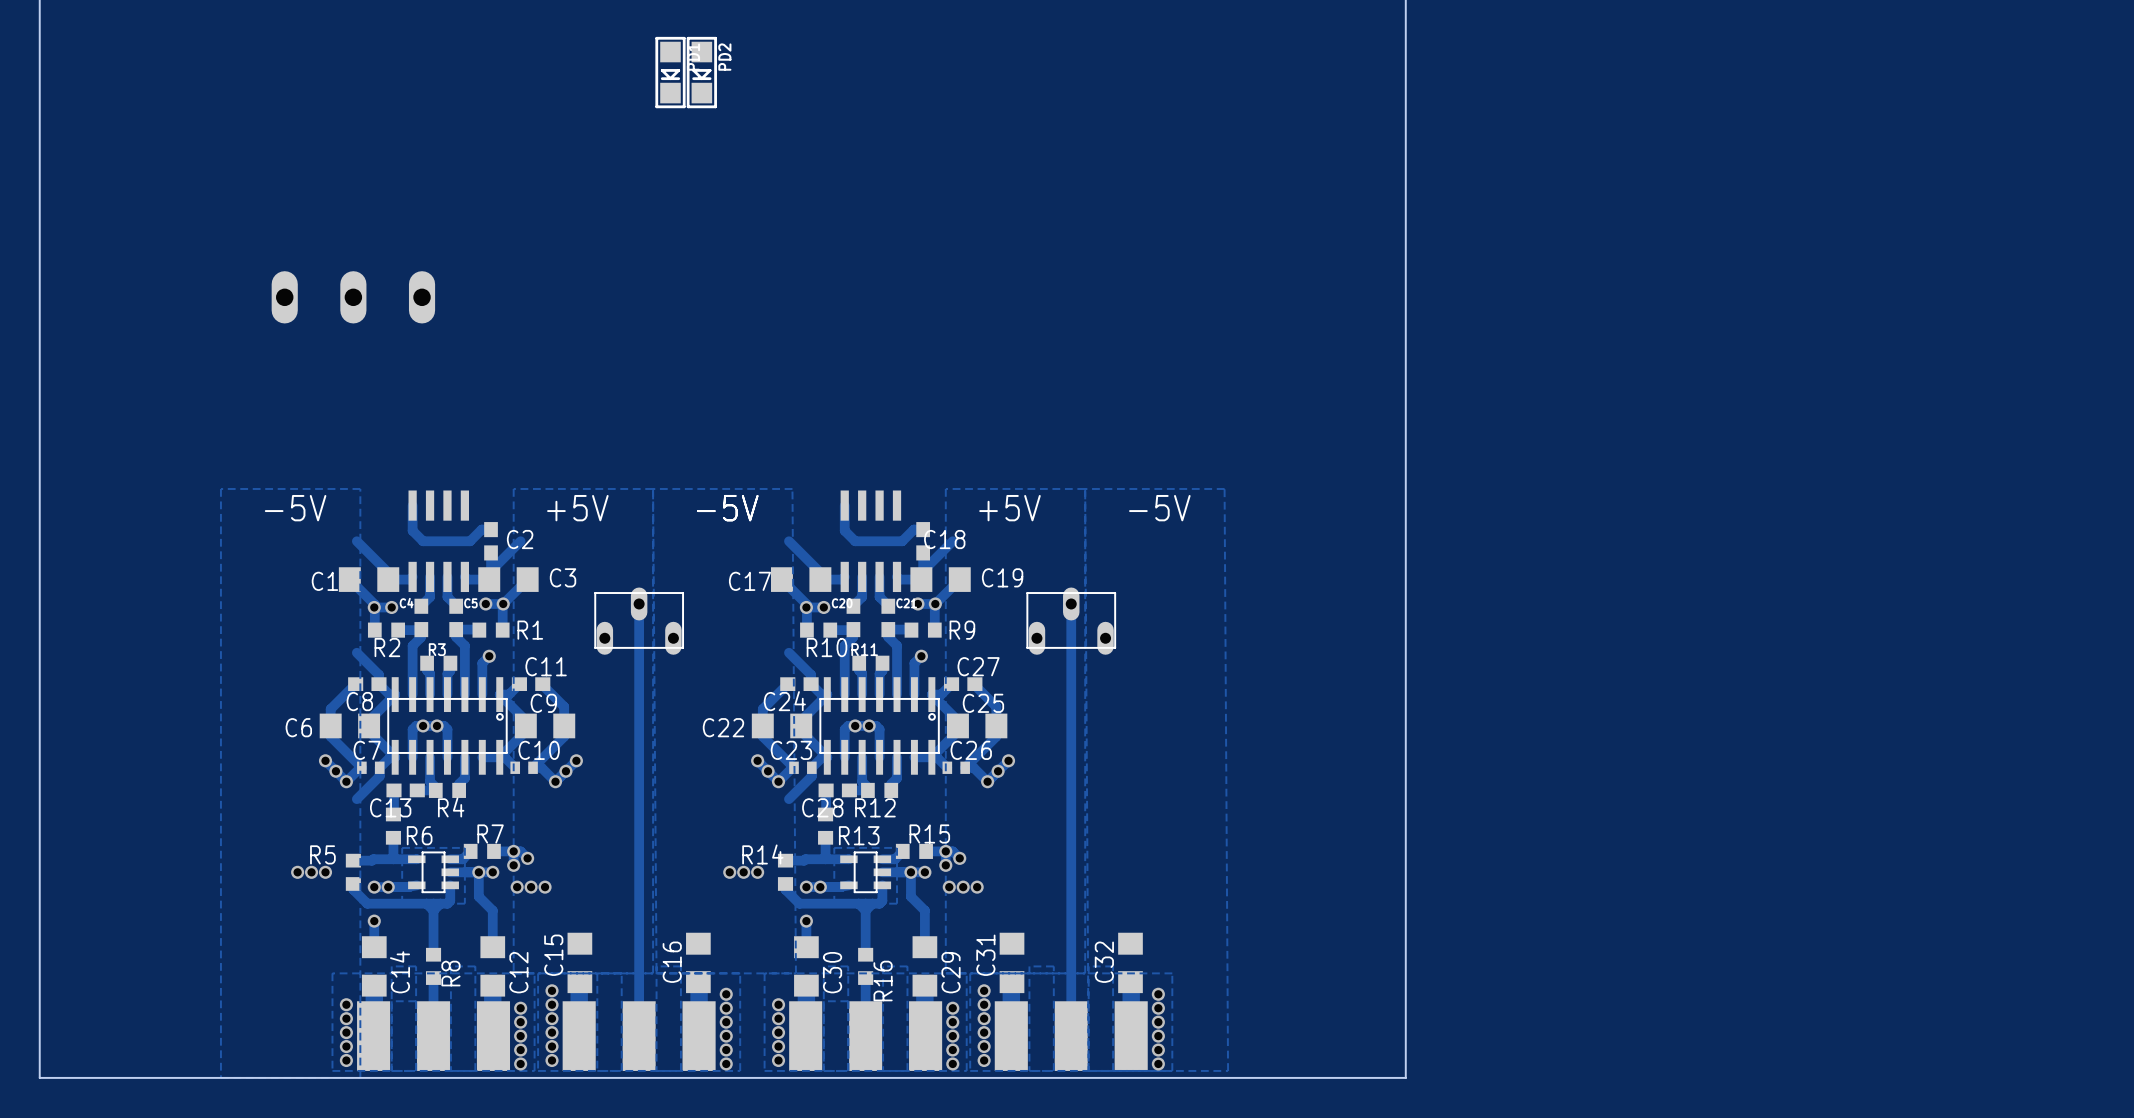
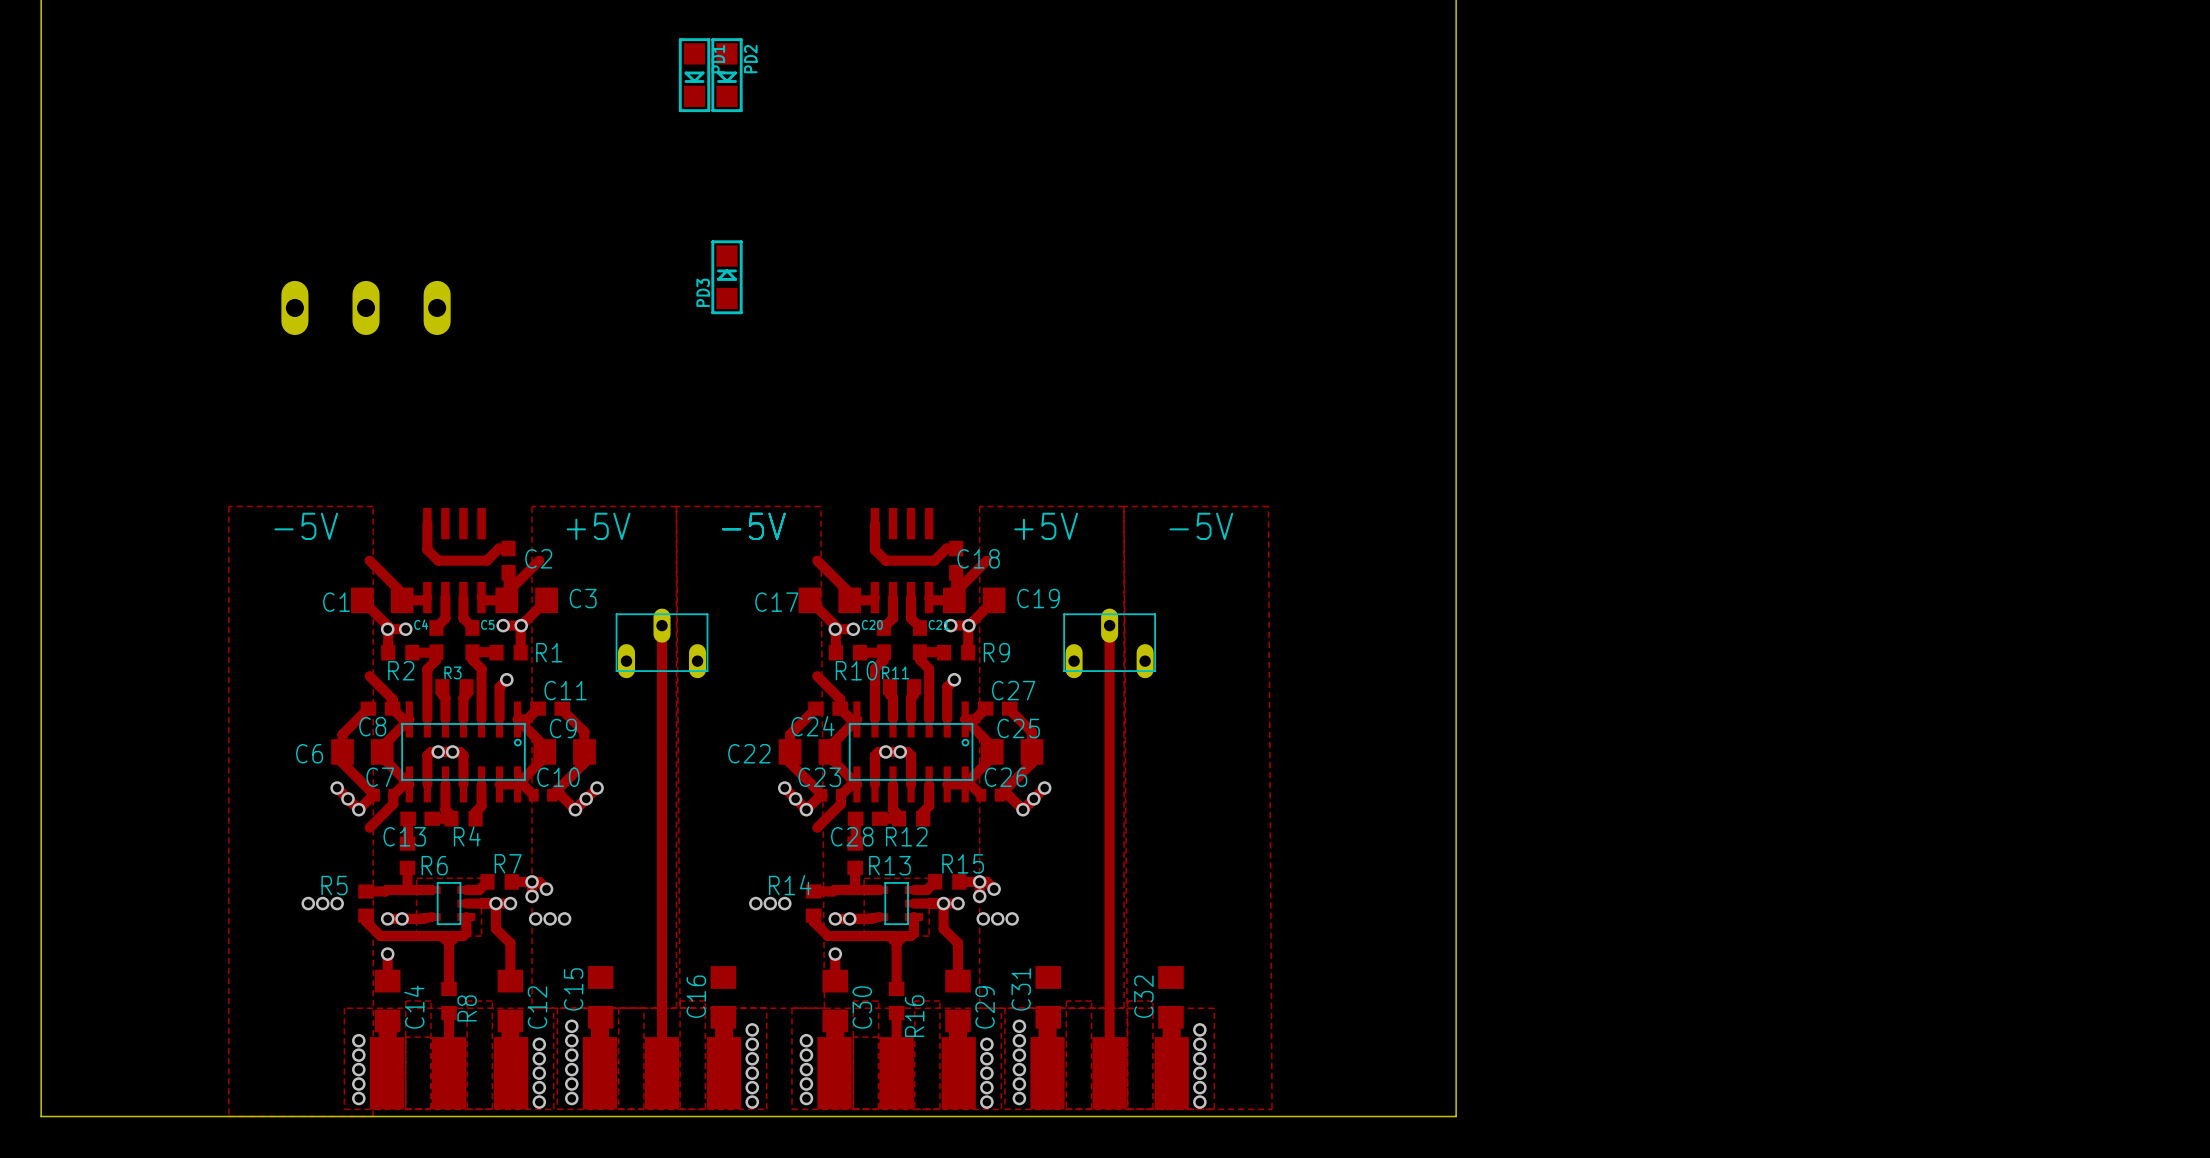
PD3: none -> (726, 277)

